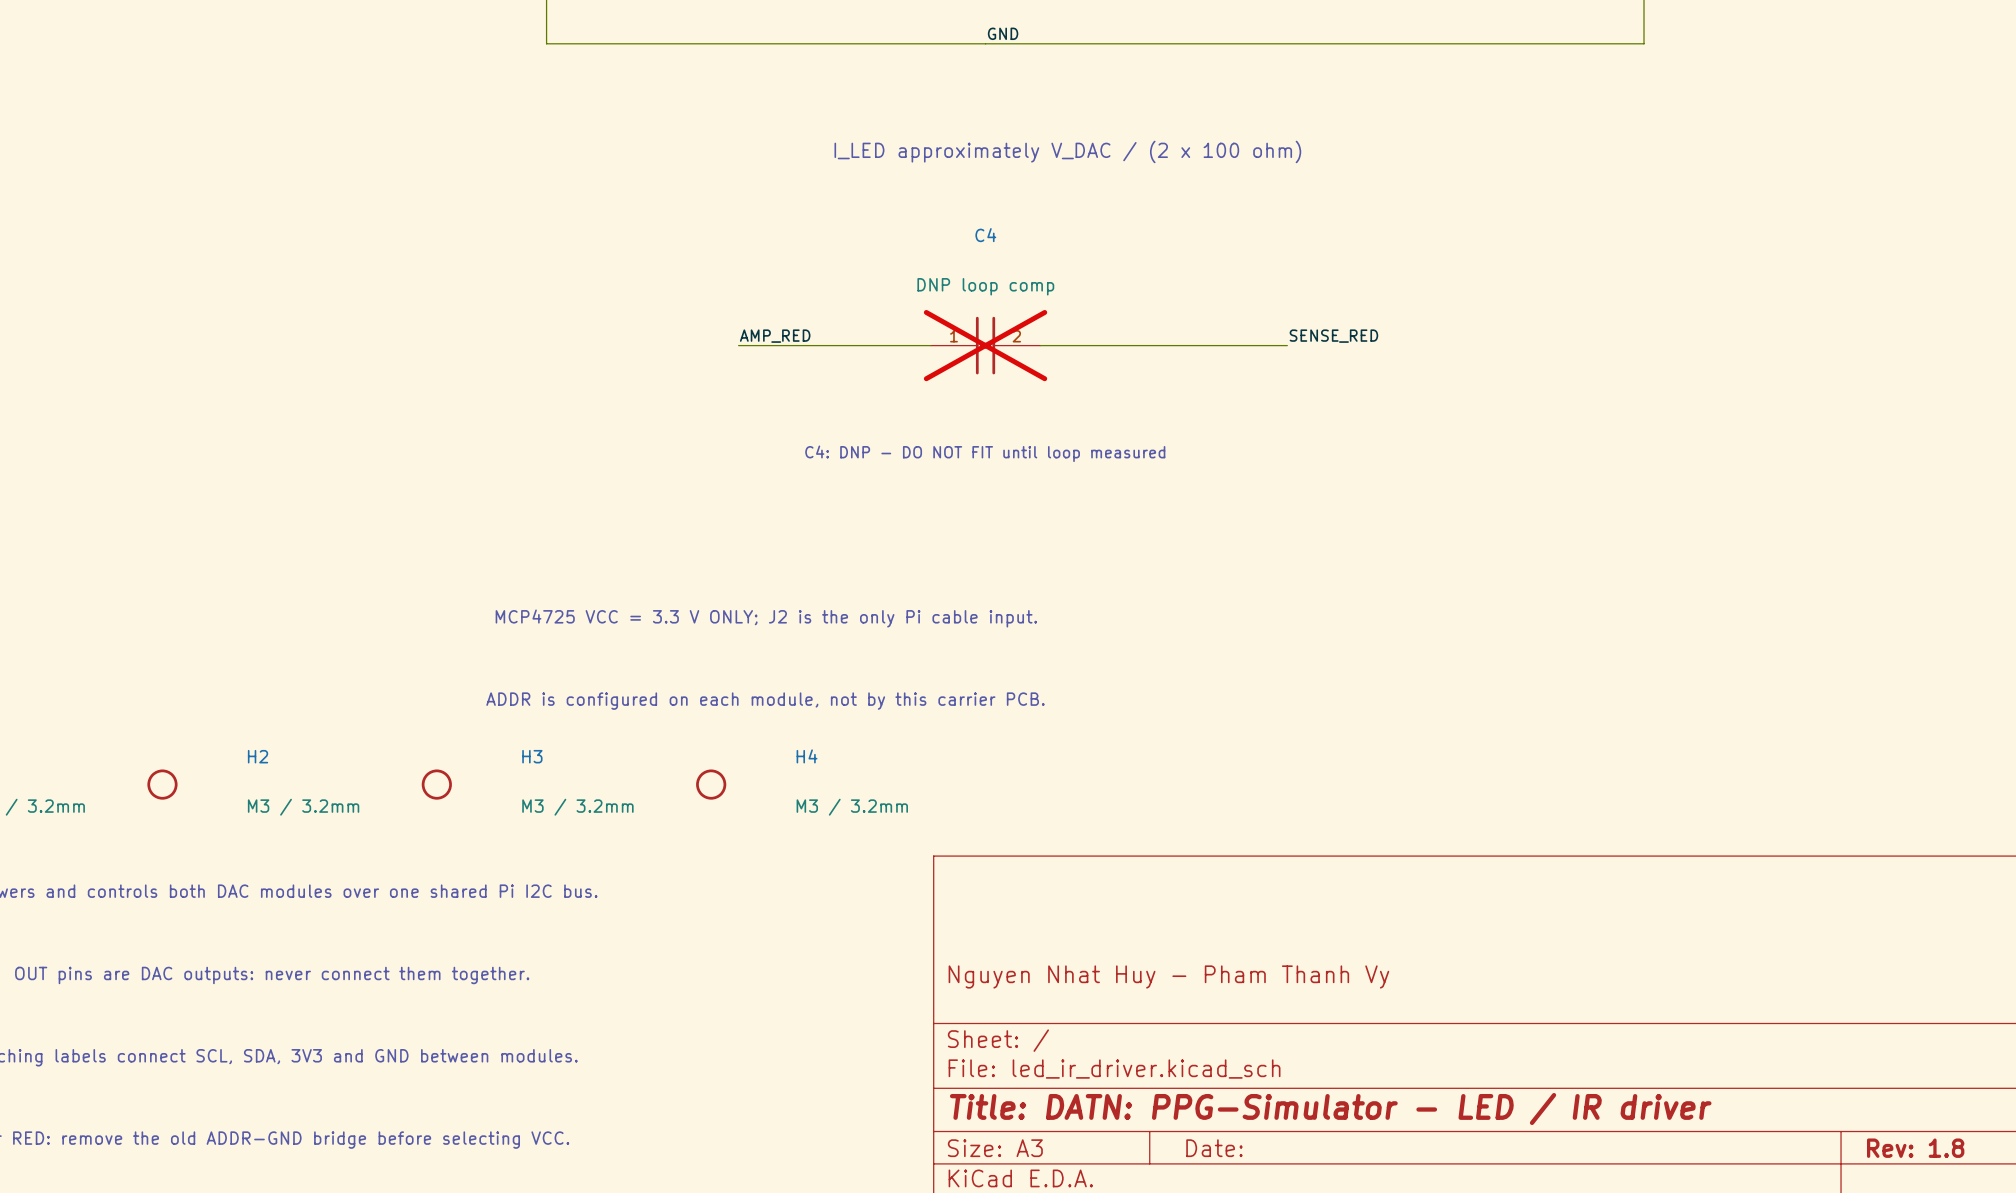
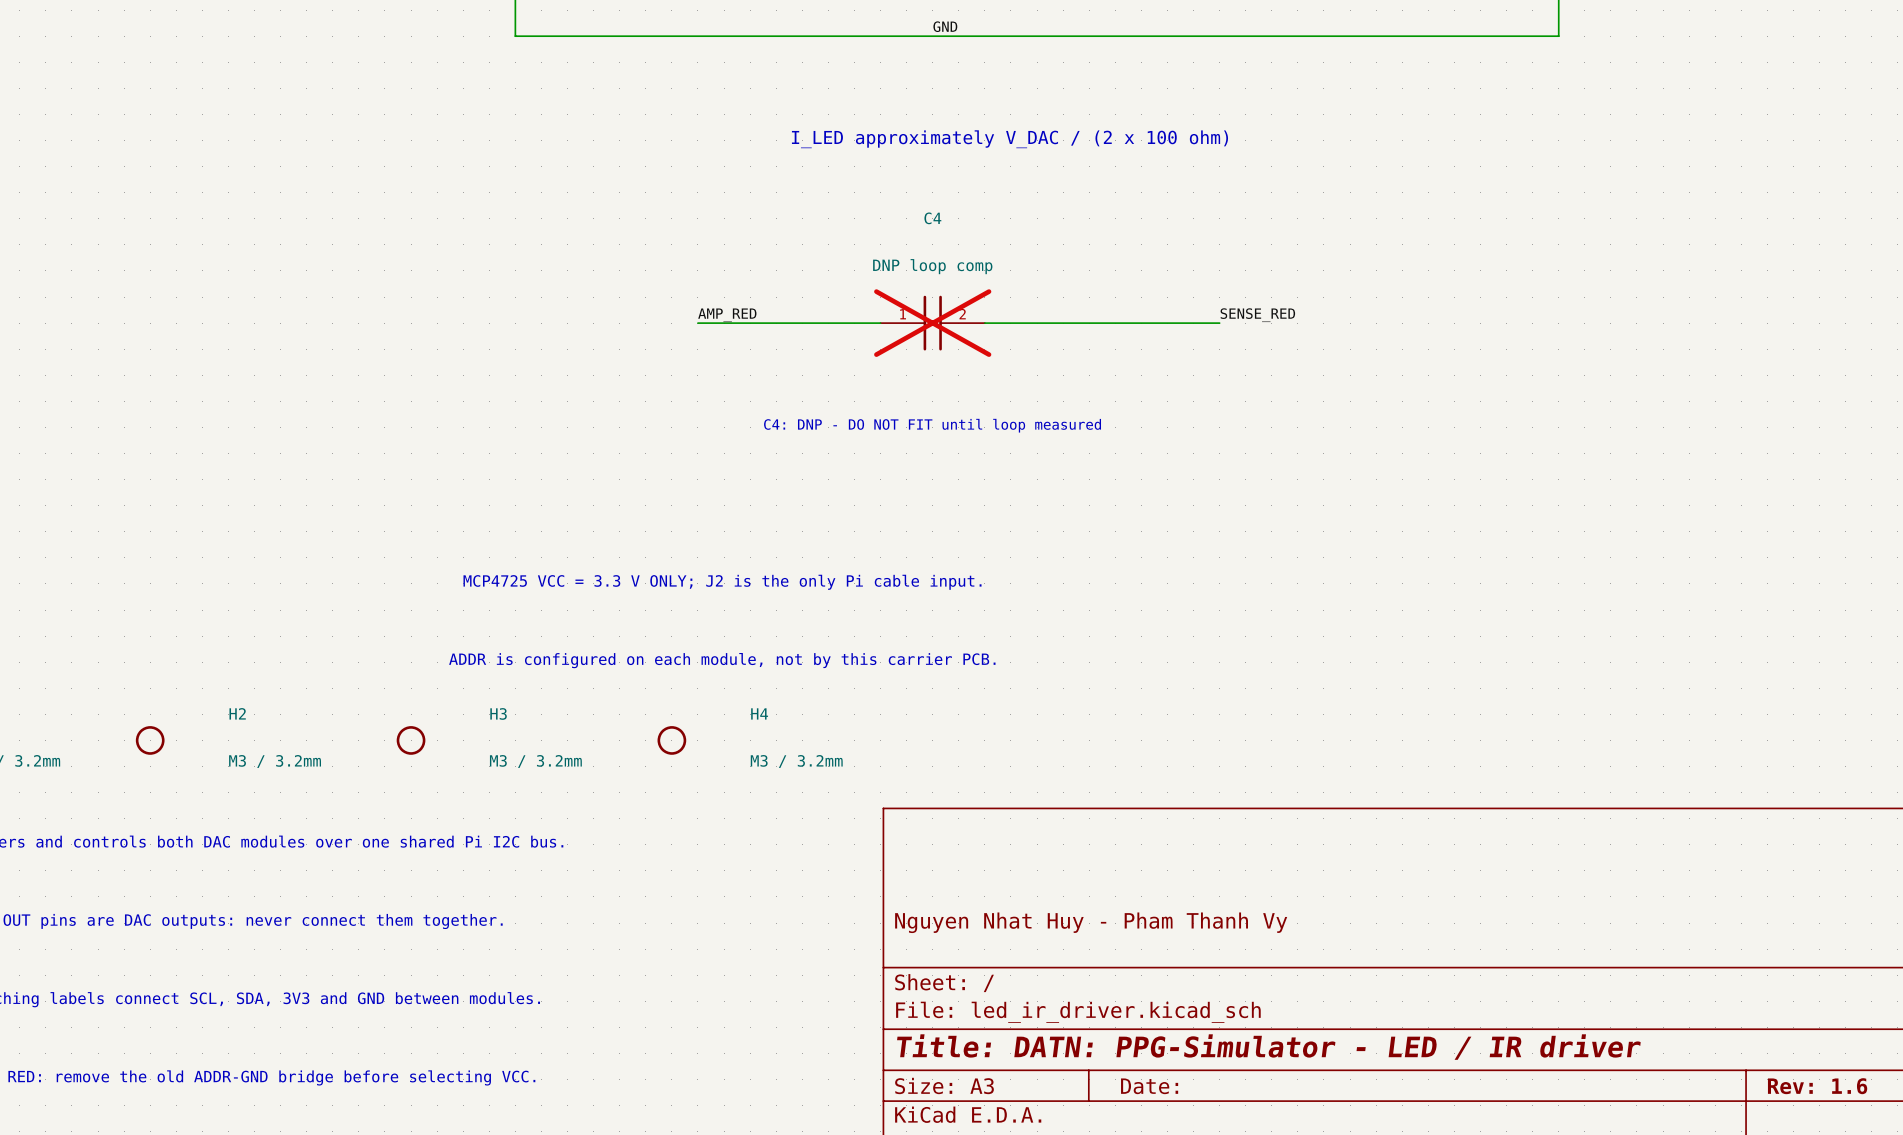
title block: Rev: 1.8 (1915, 1148) -> Rev: 1.6 (1817, 1086)

